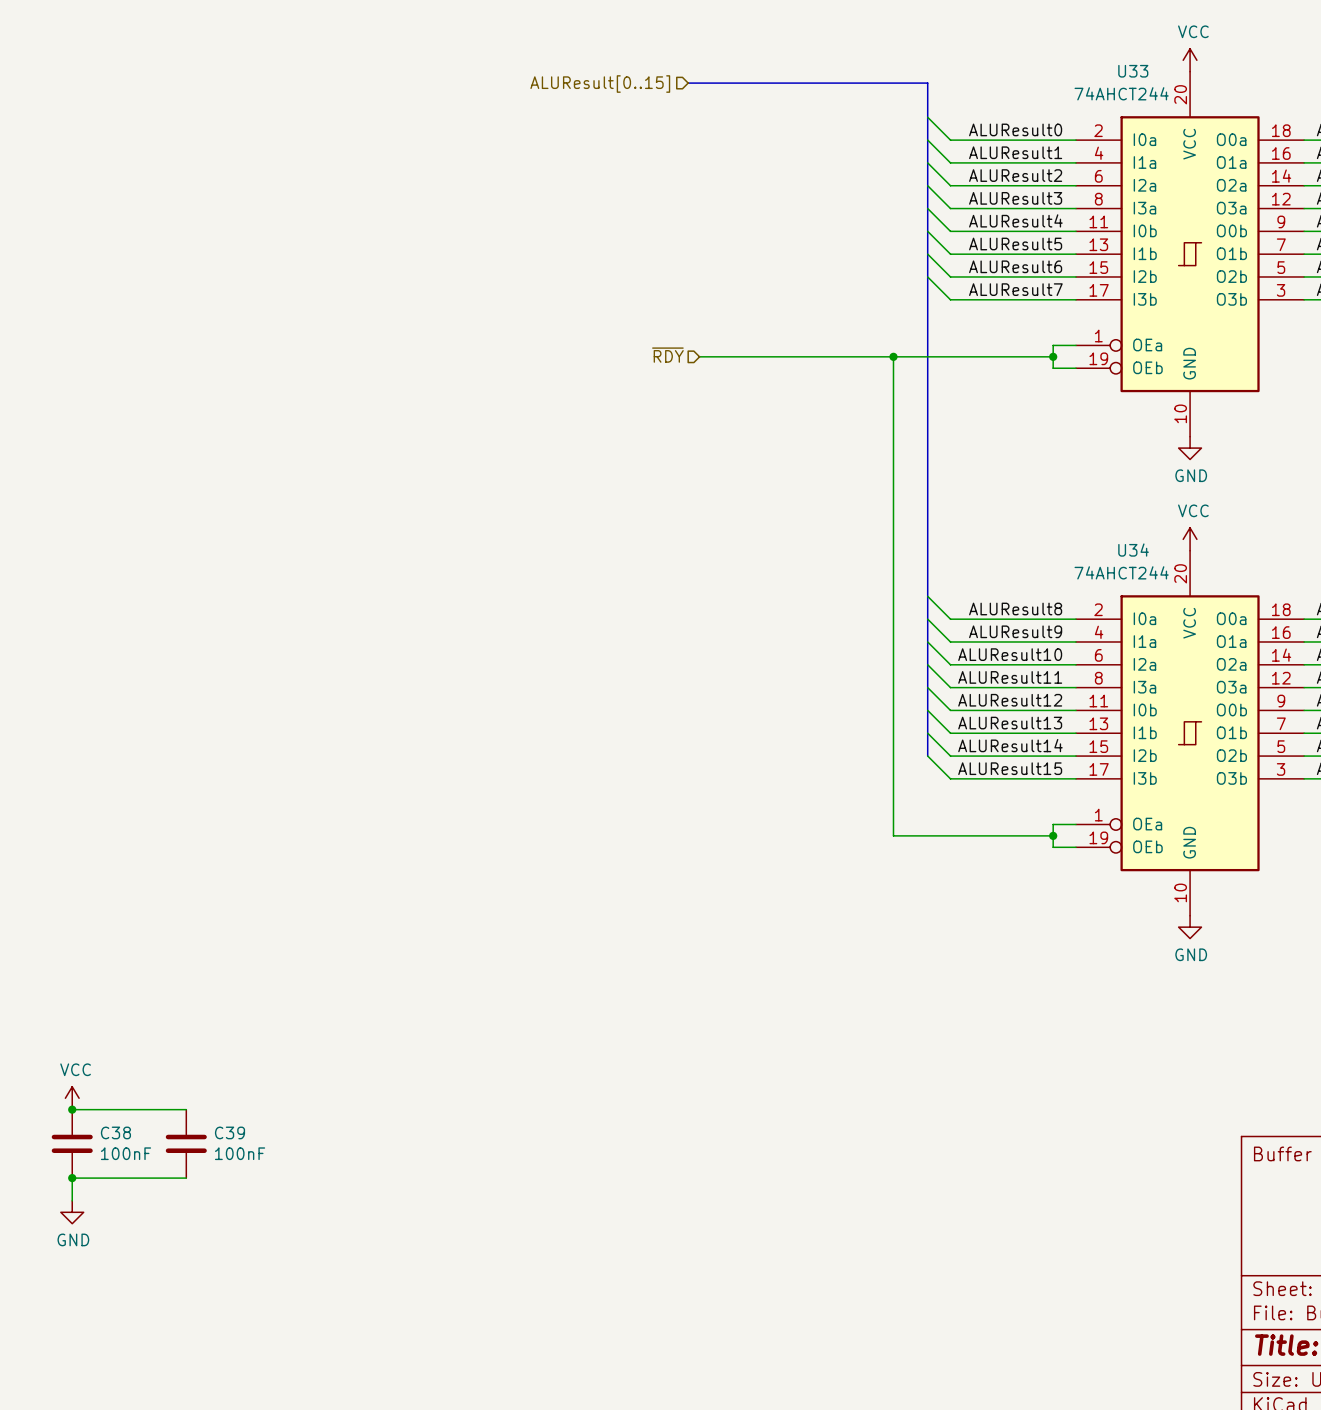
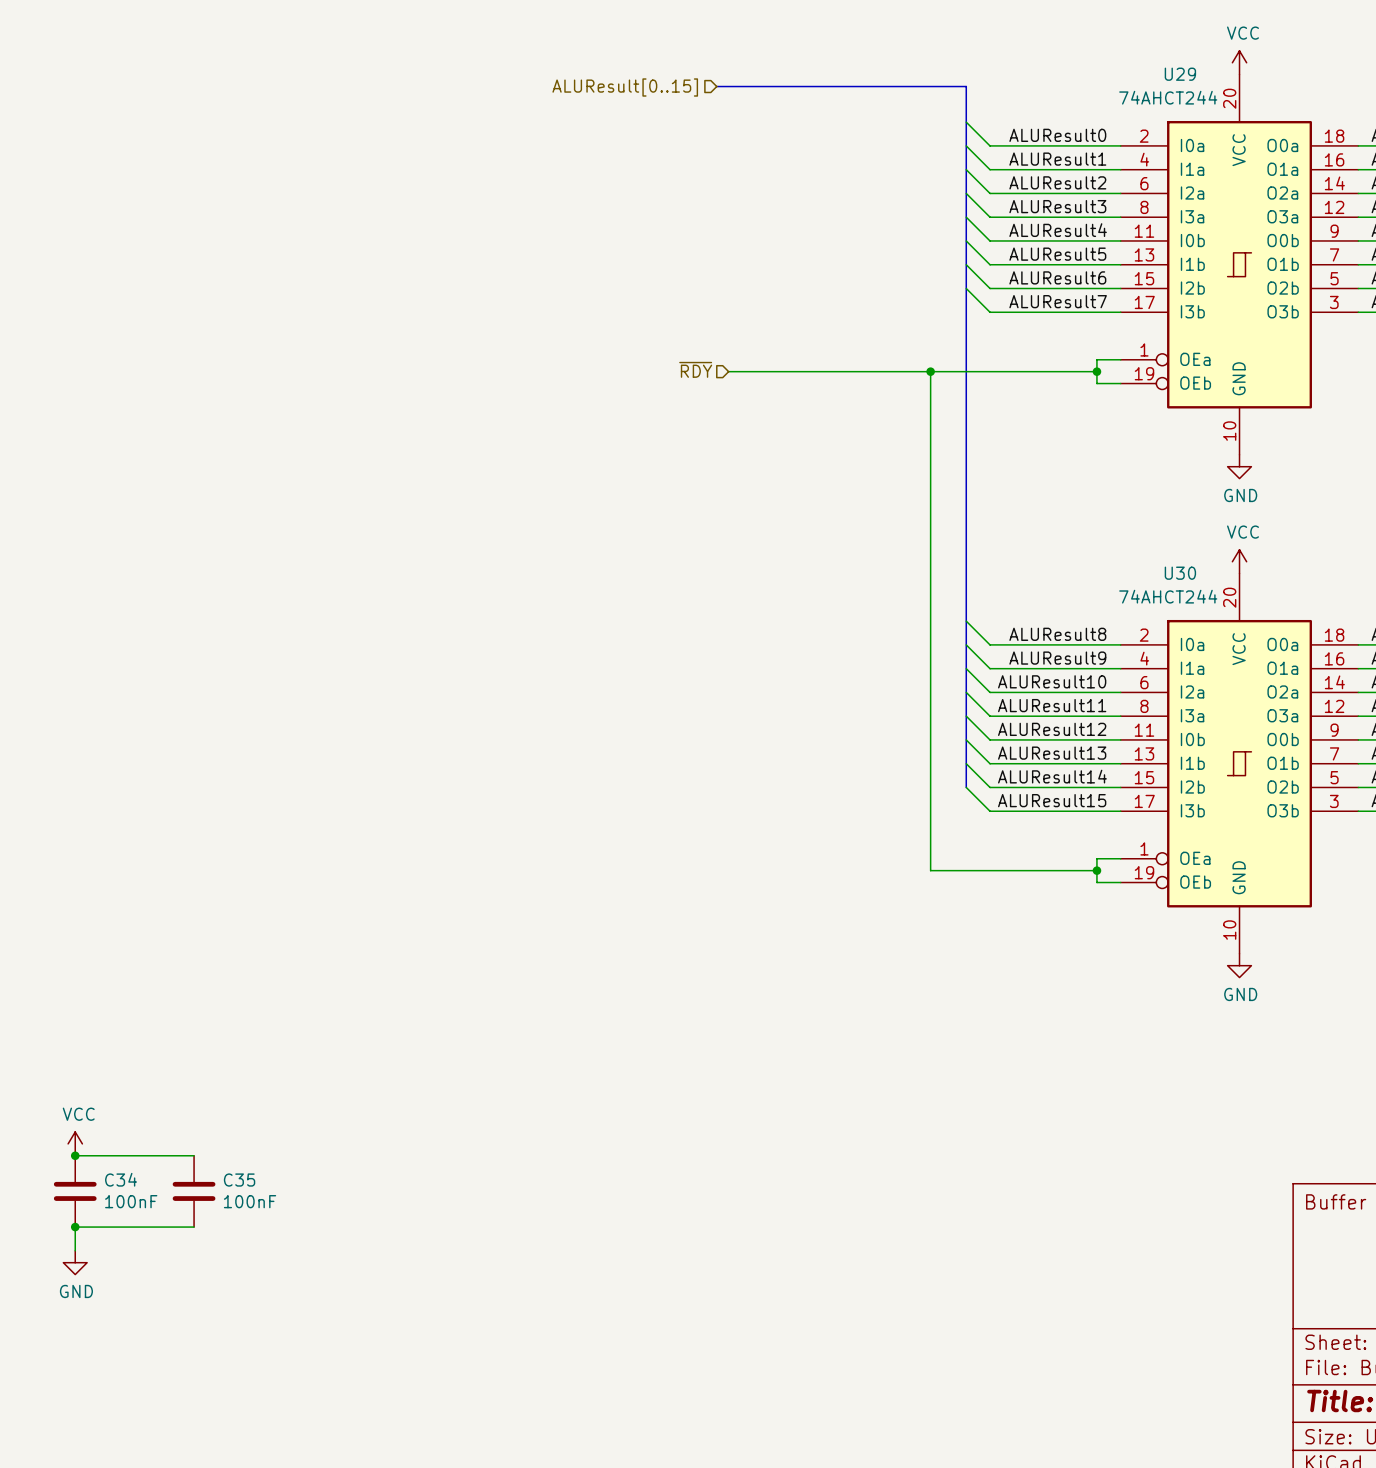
U33 name: U33 (1133, 71) -> U29 (1180, 74)
U34 name: U34 (1133, 550) -> U30 (1180, 573)
C38 name: C38 (115, 1132) -> C34 (121, 1179)
C39 name: C39 (230, 1132) -> C35 (239, 1180)

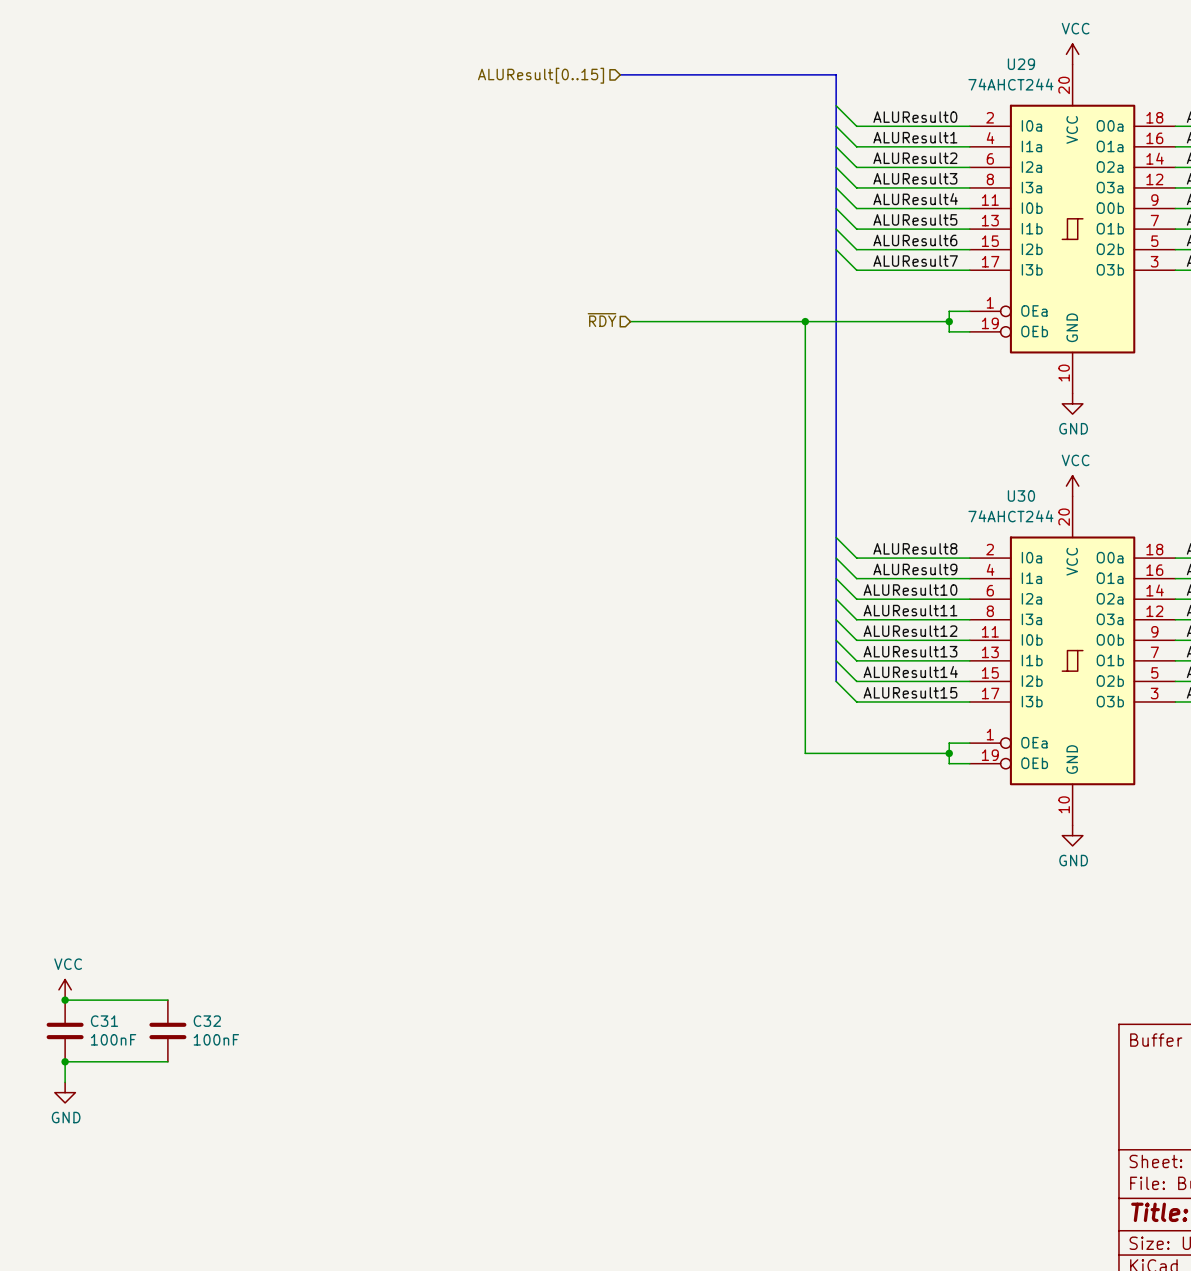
C34 name: C34 (121, 1179) -> C31 (104, 1021)
C35 name: C35 (239, 1180) -> C32 (207, 1021)

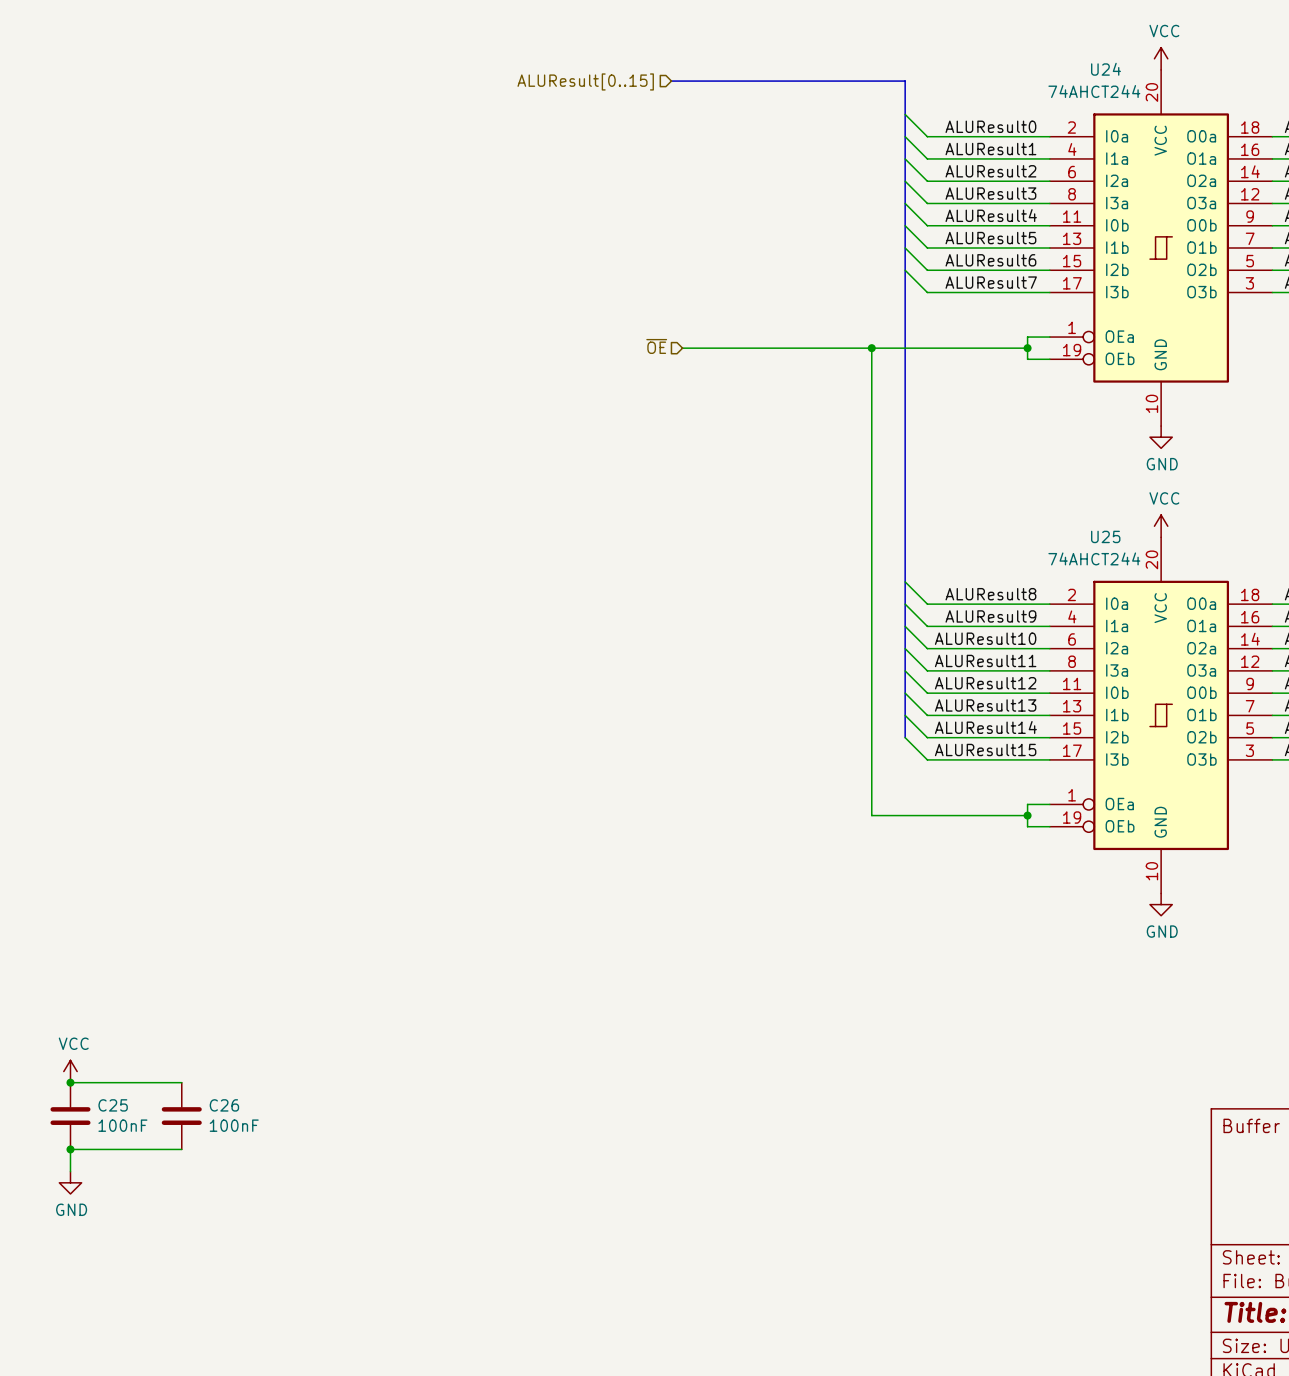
U29 name: U29 (1021, 64) -> U24 (1106, 69)
hierarchical label: ~{RDY} (602, 320) -> ~{OE} (656, 346)
U30 name: U30 (1021, 496) -> U25 (1105, 536)
C31 name: C31 (104, 1021) -> C25 (113, 1105)
C32 name: C32 (207, 1021) -> C26 (224, 1105)

